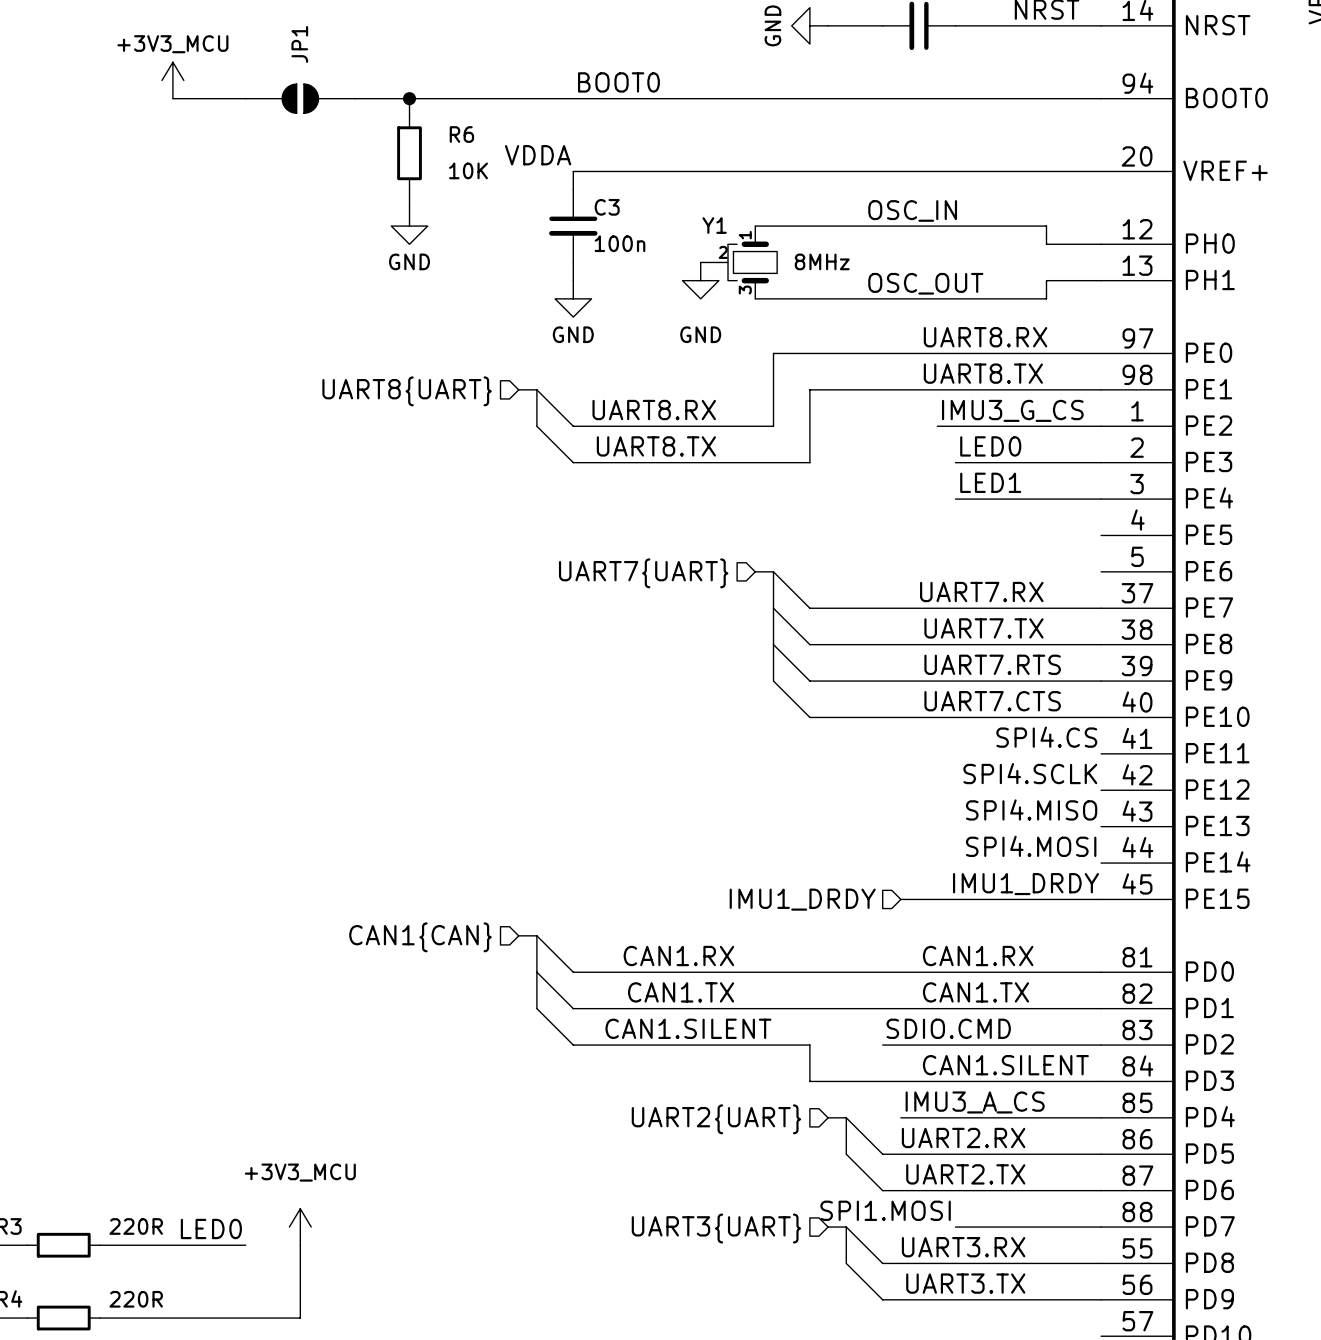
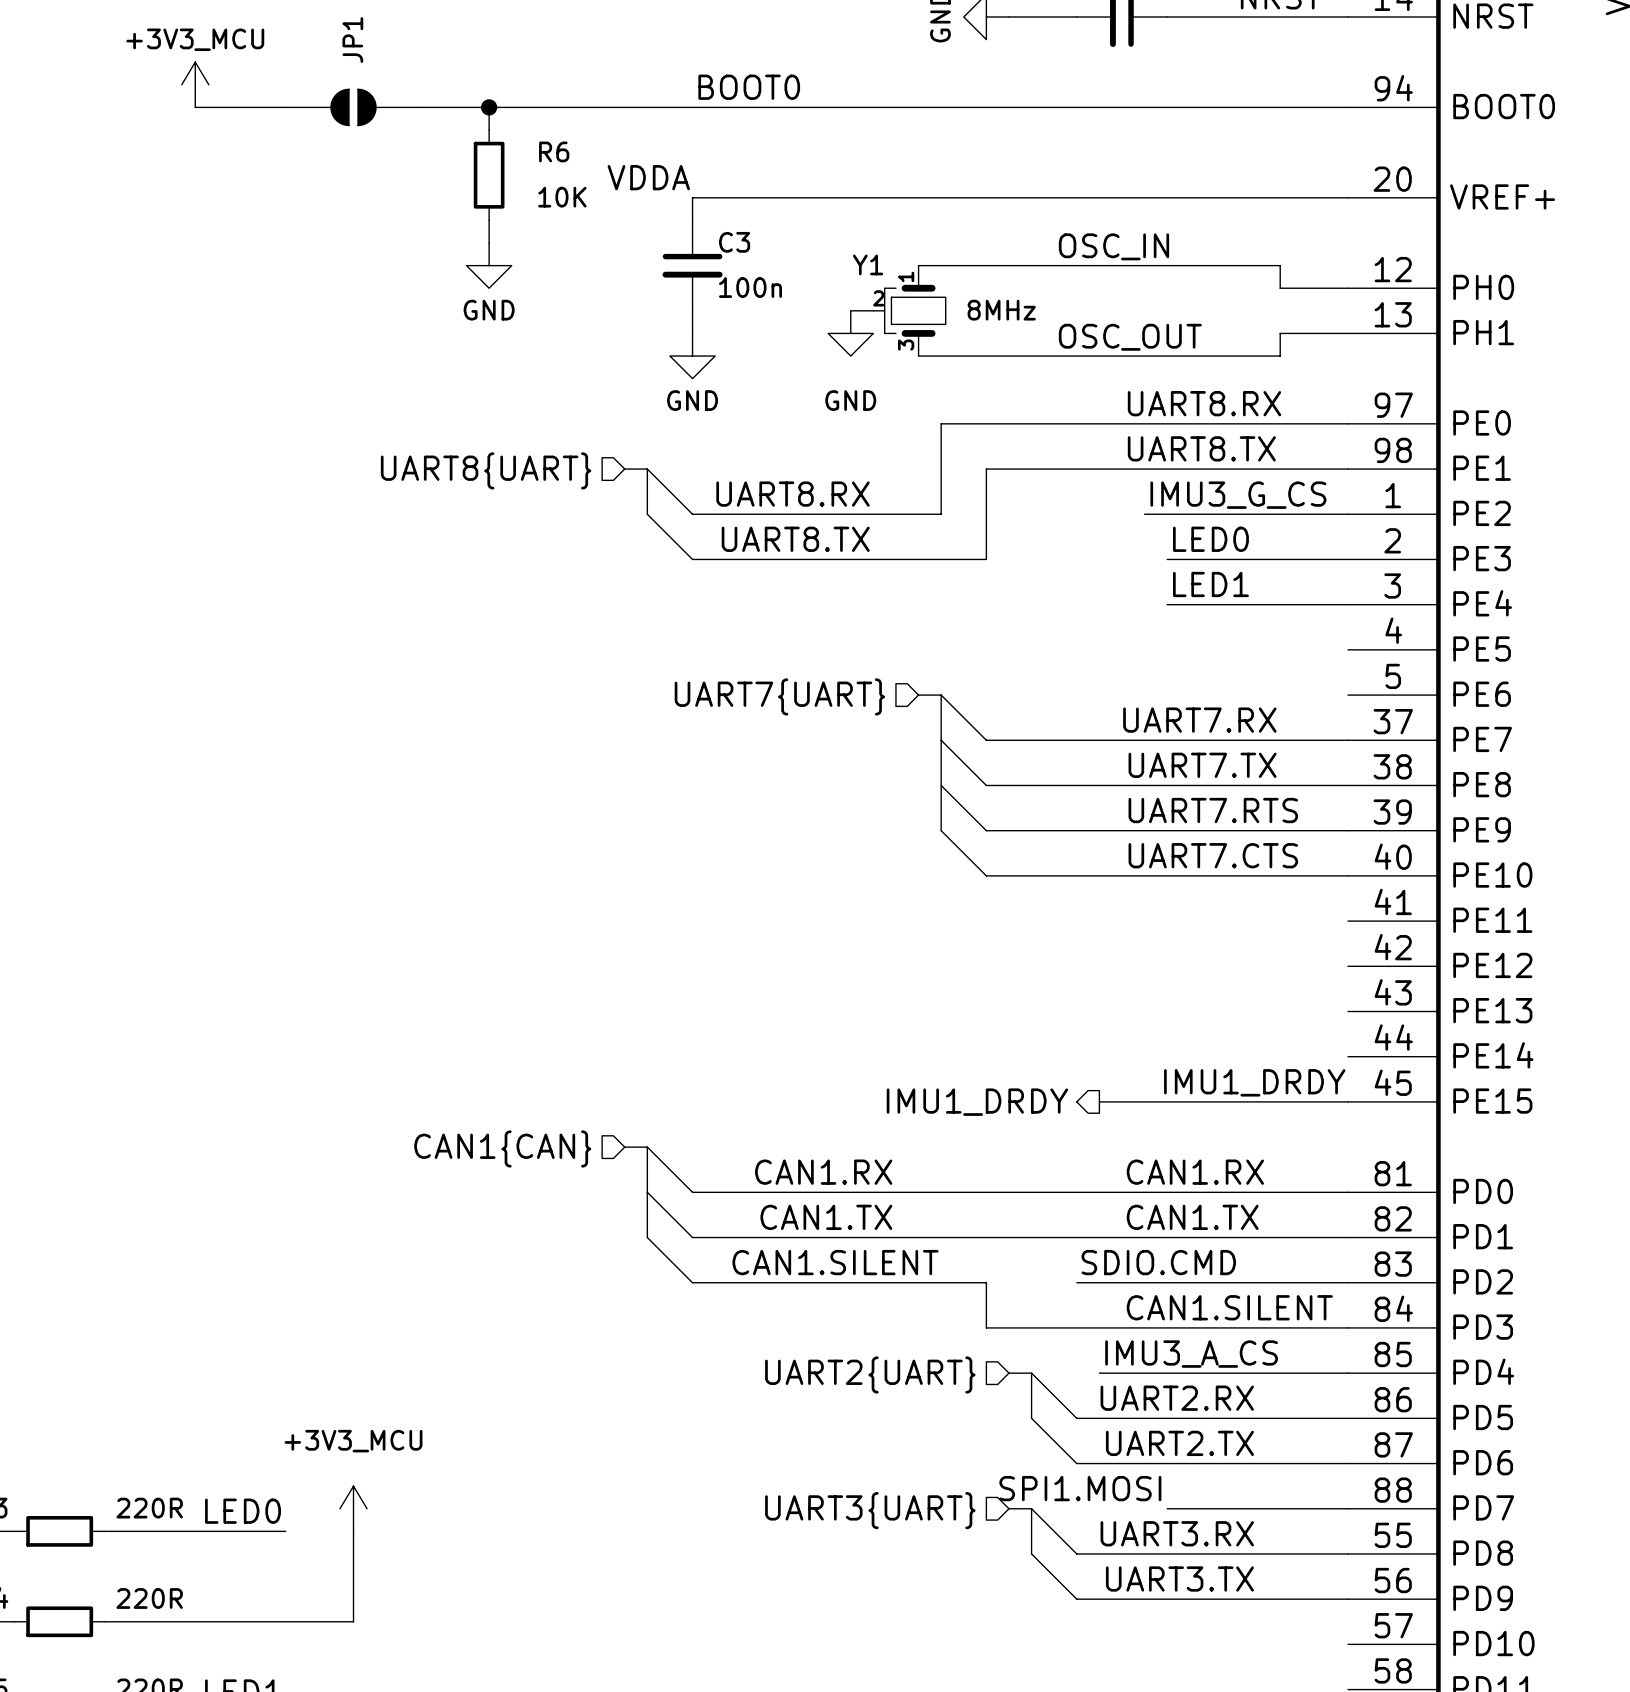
label: SPI4.CS (1046, 737) -> none
label: SPI4.SCLK (1030, 773) -> none
label: SPI4.MISO (1031, 809) -> none
label: SPI4.MOSI (1031, 846) -> none
hierarchical label shape: input (802, 899) -> output (977, 1102)

